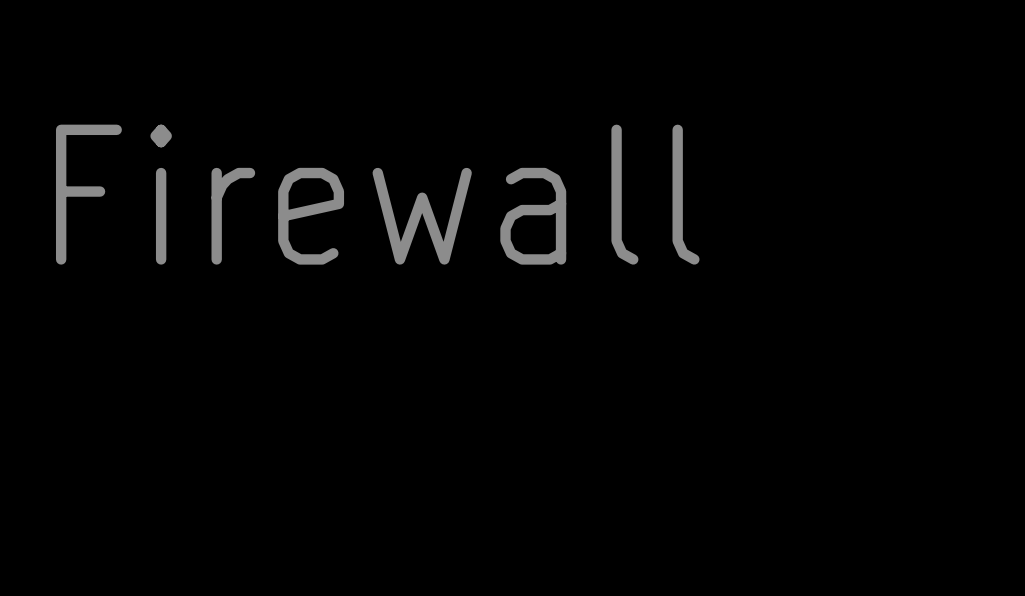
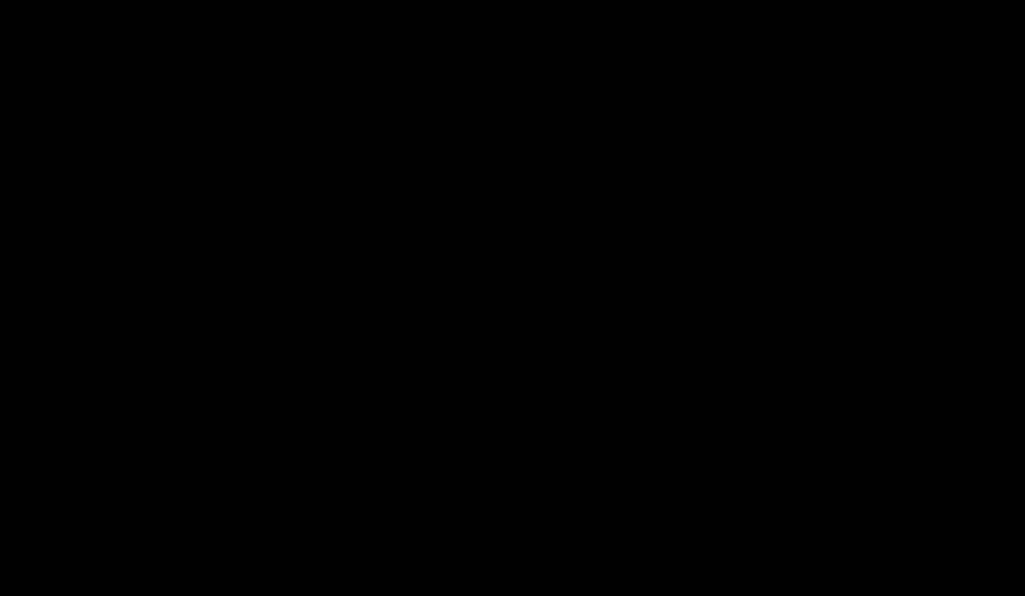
text: Firewall (377, 194) -> none

